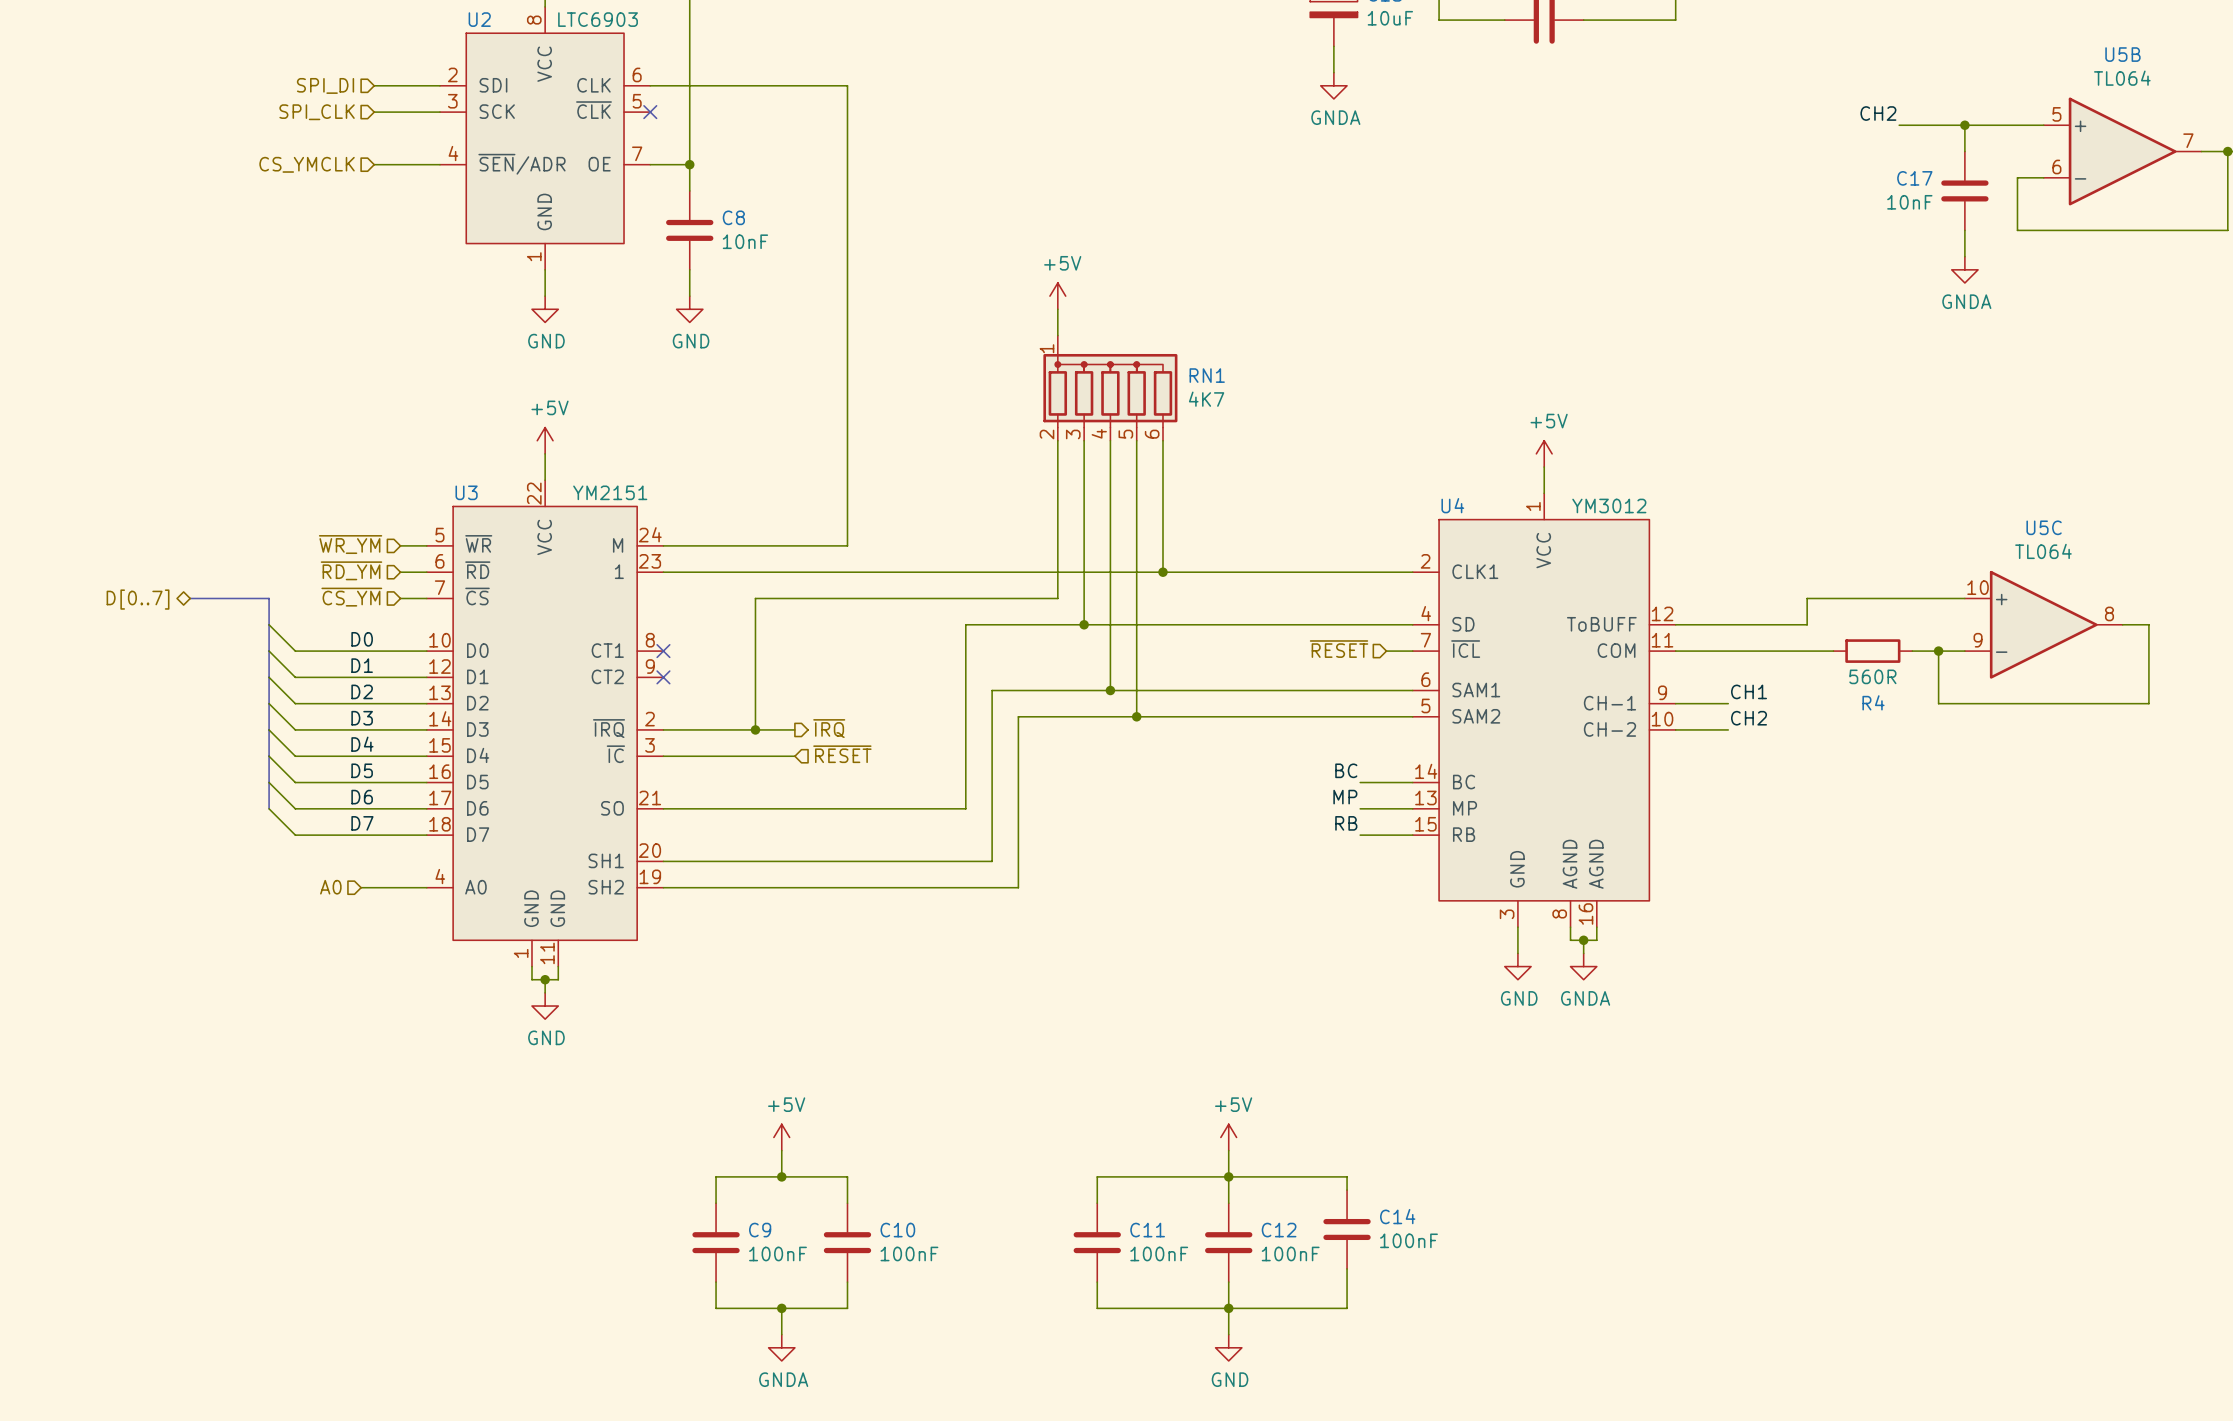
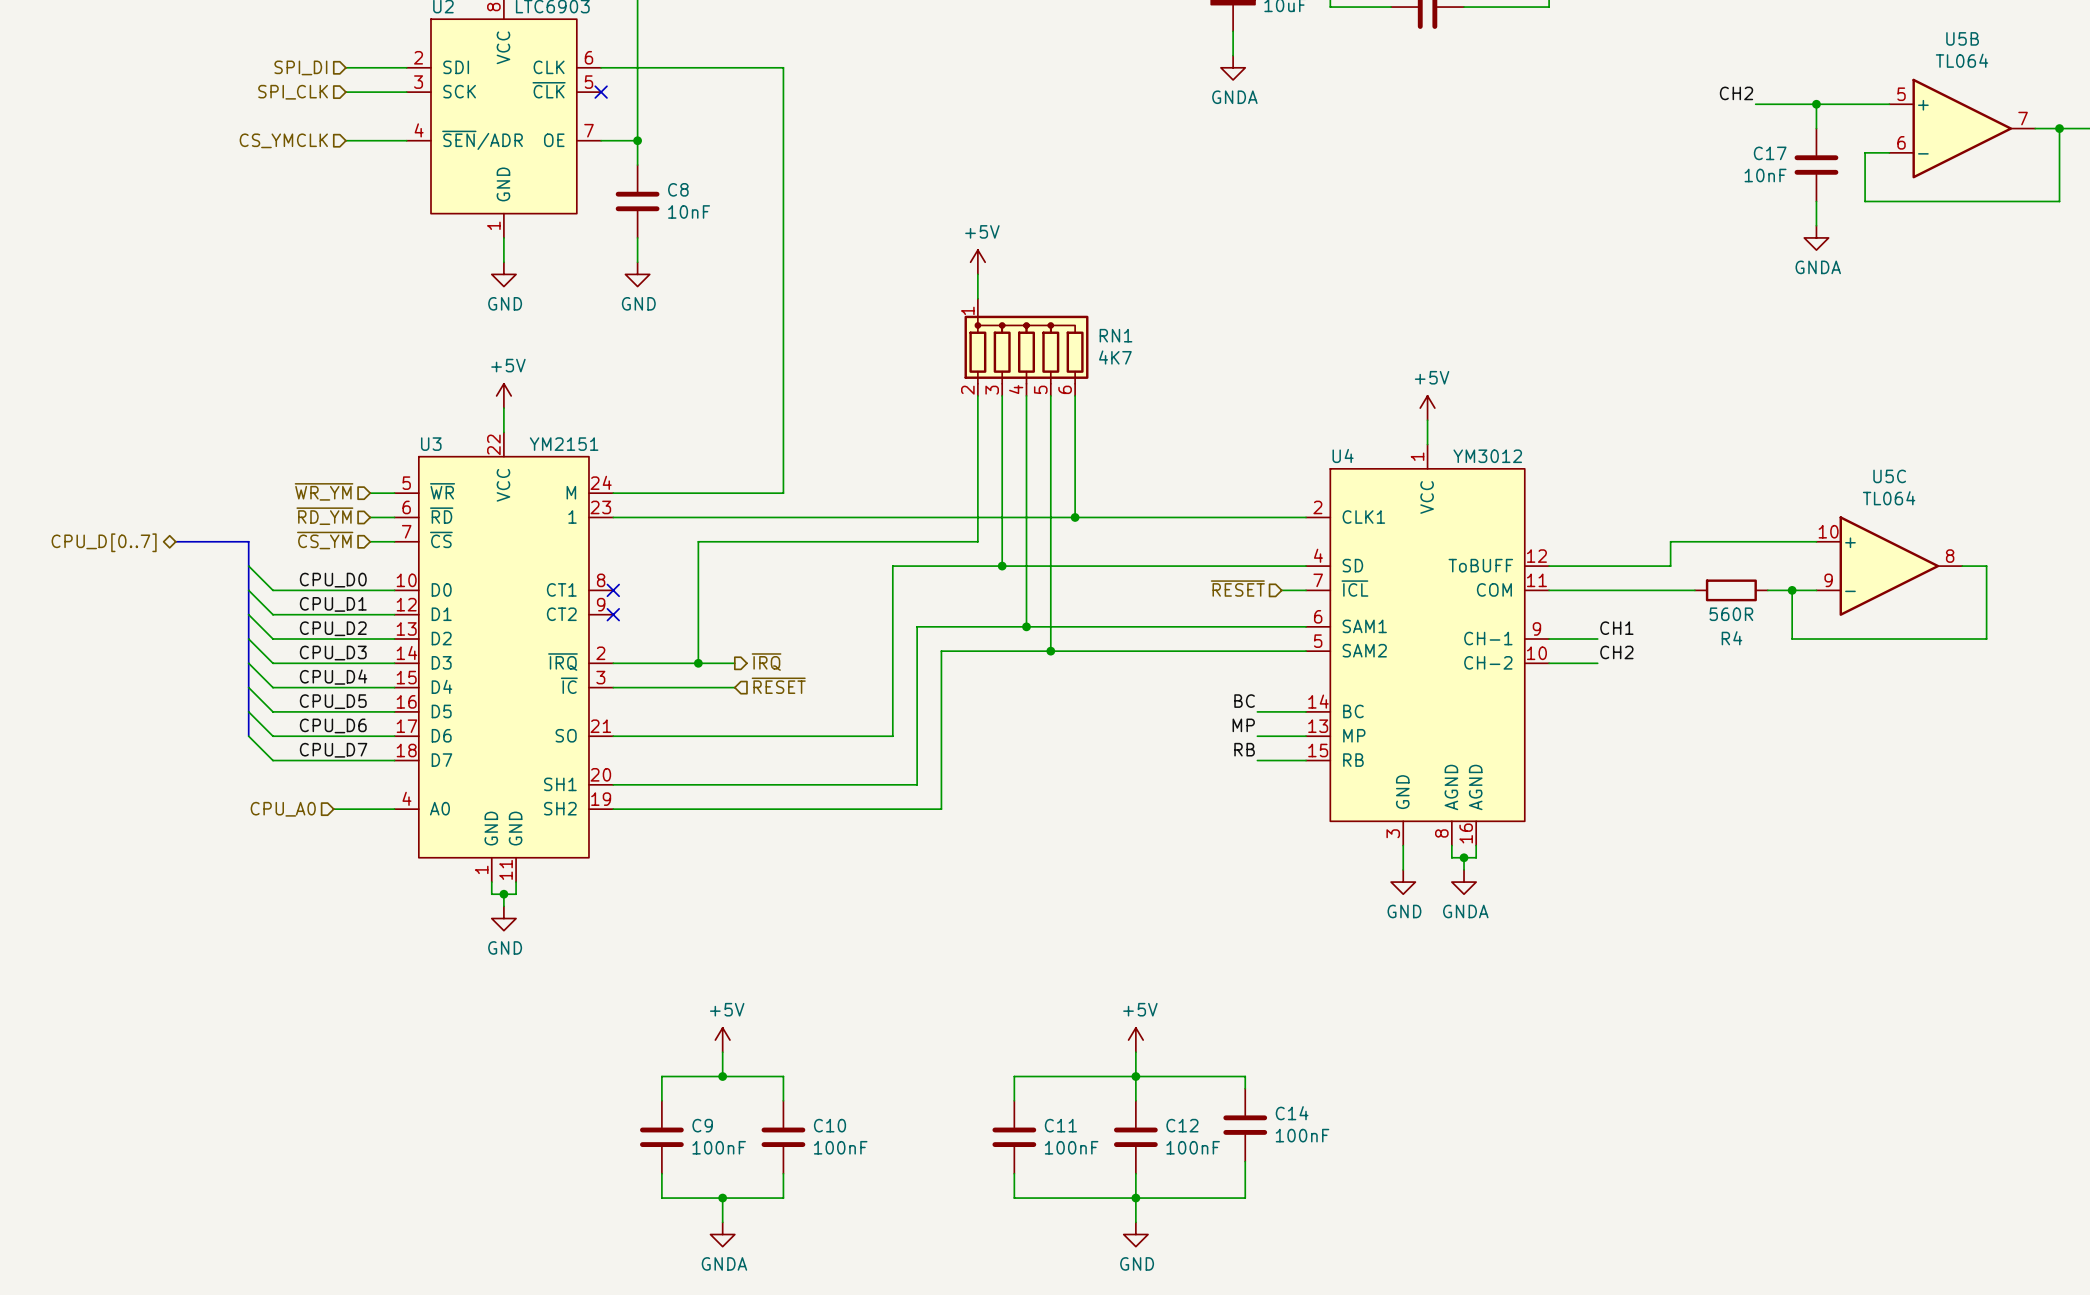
hierarchical label: D[0..7] (138, 599) -> CPU_D[0..7] (104, 542)
label: none -> CPU_D0 (333, 580)
label: D0 (362, 639) -> none
label: D1 (362, 665) -> none
label: none -> CPU_D1 (333, 604)
label: D2 (362, 691) -> none
label: none -> CPU_D2 (333, 628)
label: none -> CPU_D3 (333, 653)
label: D3 (362, 718) -> none
label: none -> CPU_D4 (333, 677)
label: D4 (362, 744) -> none
label: D5 (362, 770) -> none
label: none -> CPU_D5 (333, 701)
label: none -> CPU_D6 (333, 725)
label: D6 (362, 797) -> none
label: D7 (362, 823) -> none
label: none -> CPU_D7 (333, 750)
hierarchical label: A0 (330, 887) -> CPU_A0 (283, 809)

